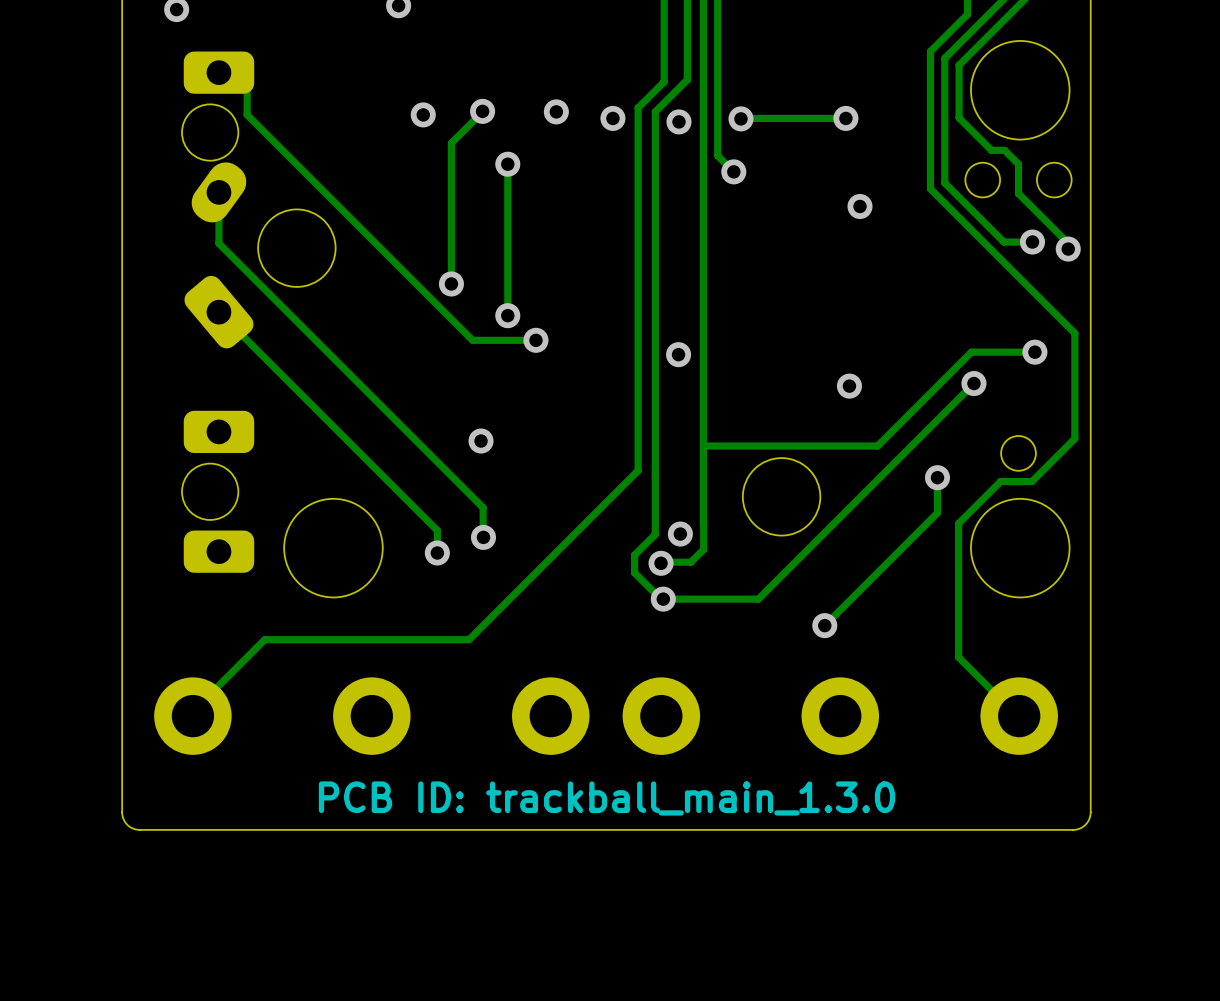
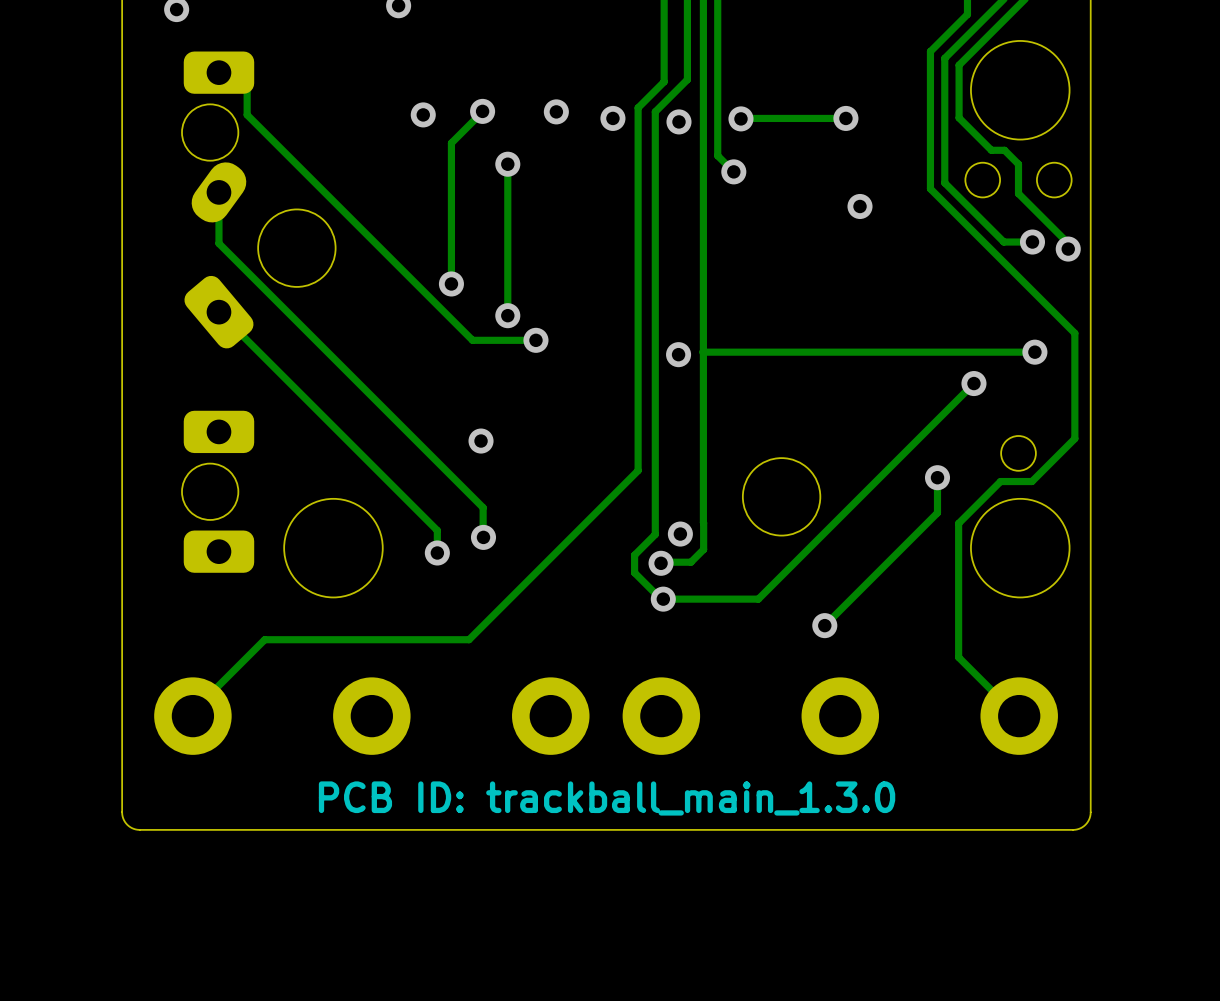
track: (971, 352) (877, 446) (705, 446) -> (971, 352) (702, 352)
via: (849, 386) -> none

